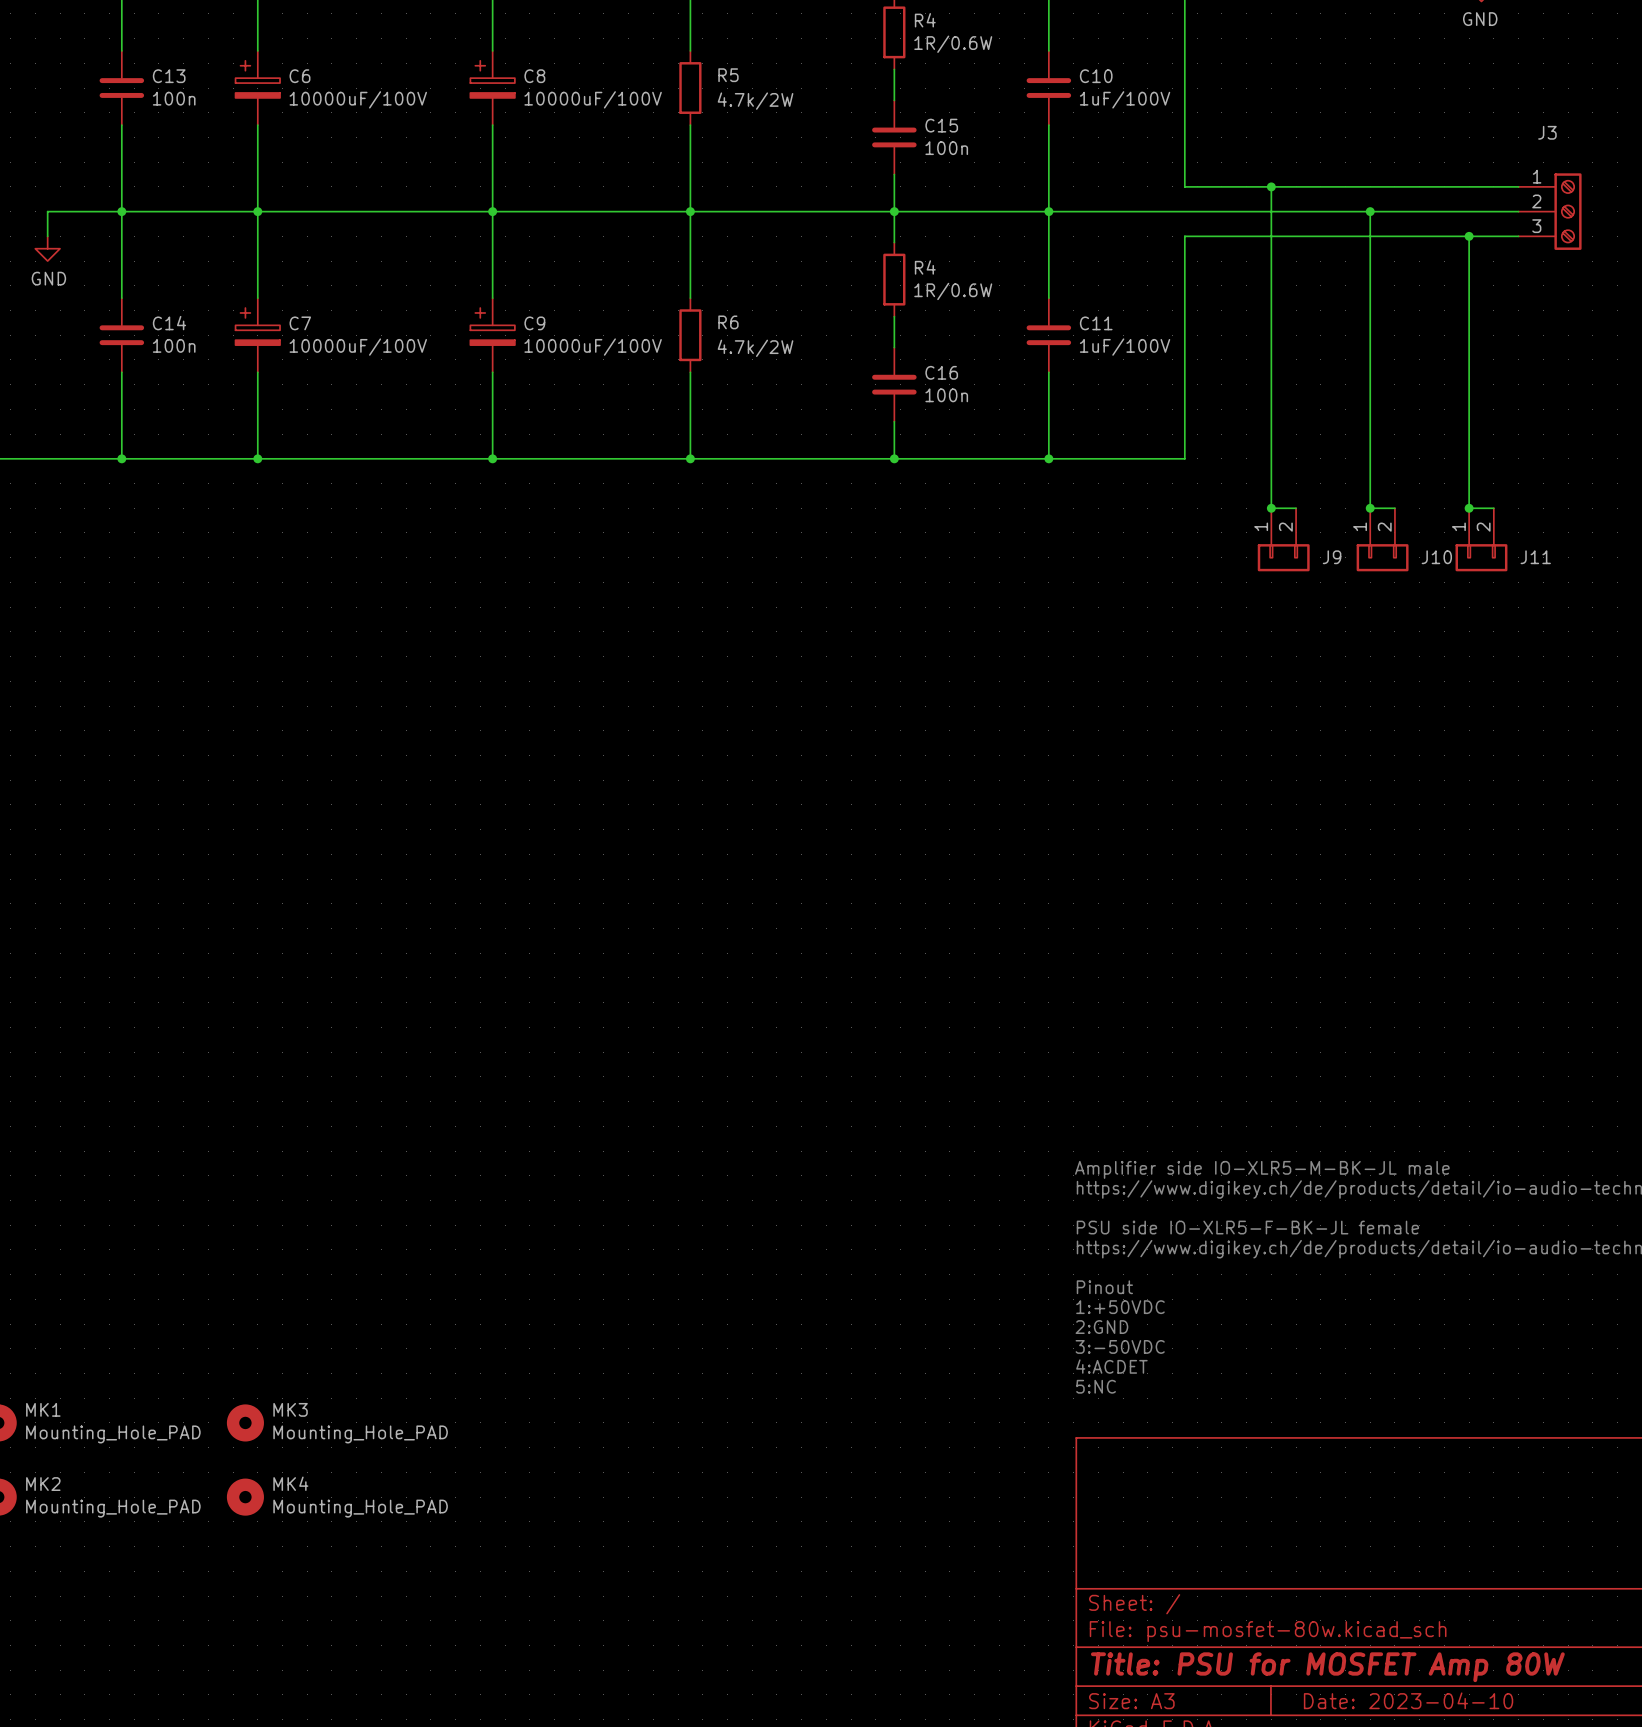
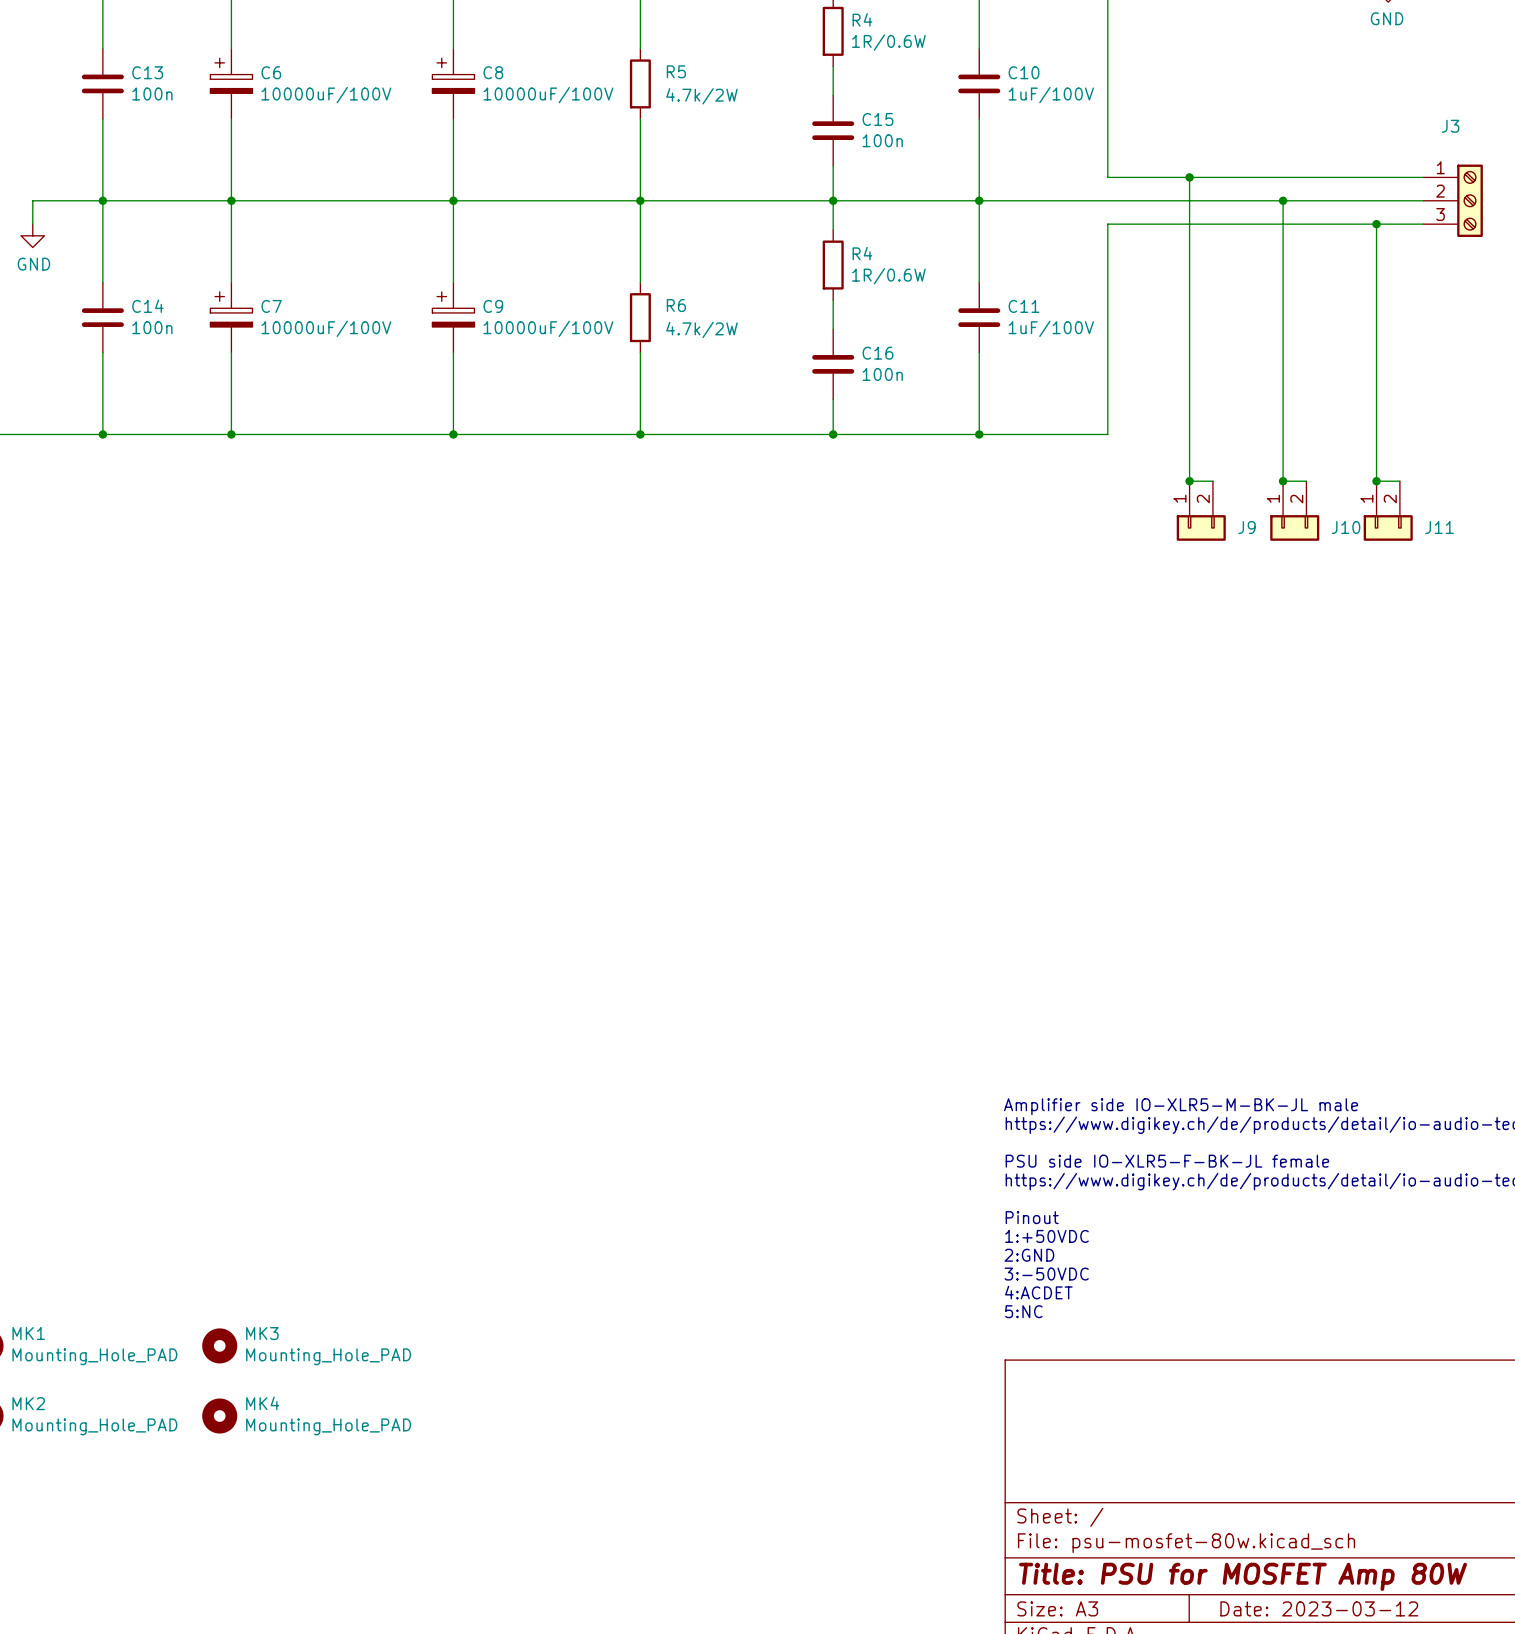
title block: Date: 2023-04-10 (1408, 1700) -> Date: 2023-03-12 (1319, 1608)

